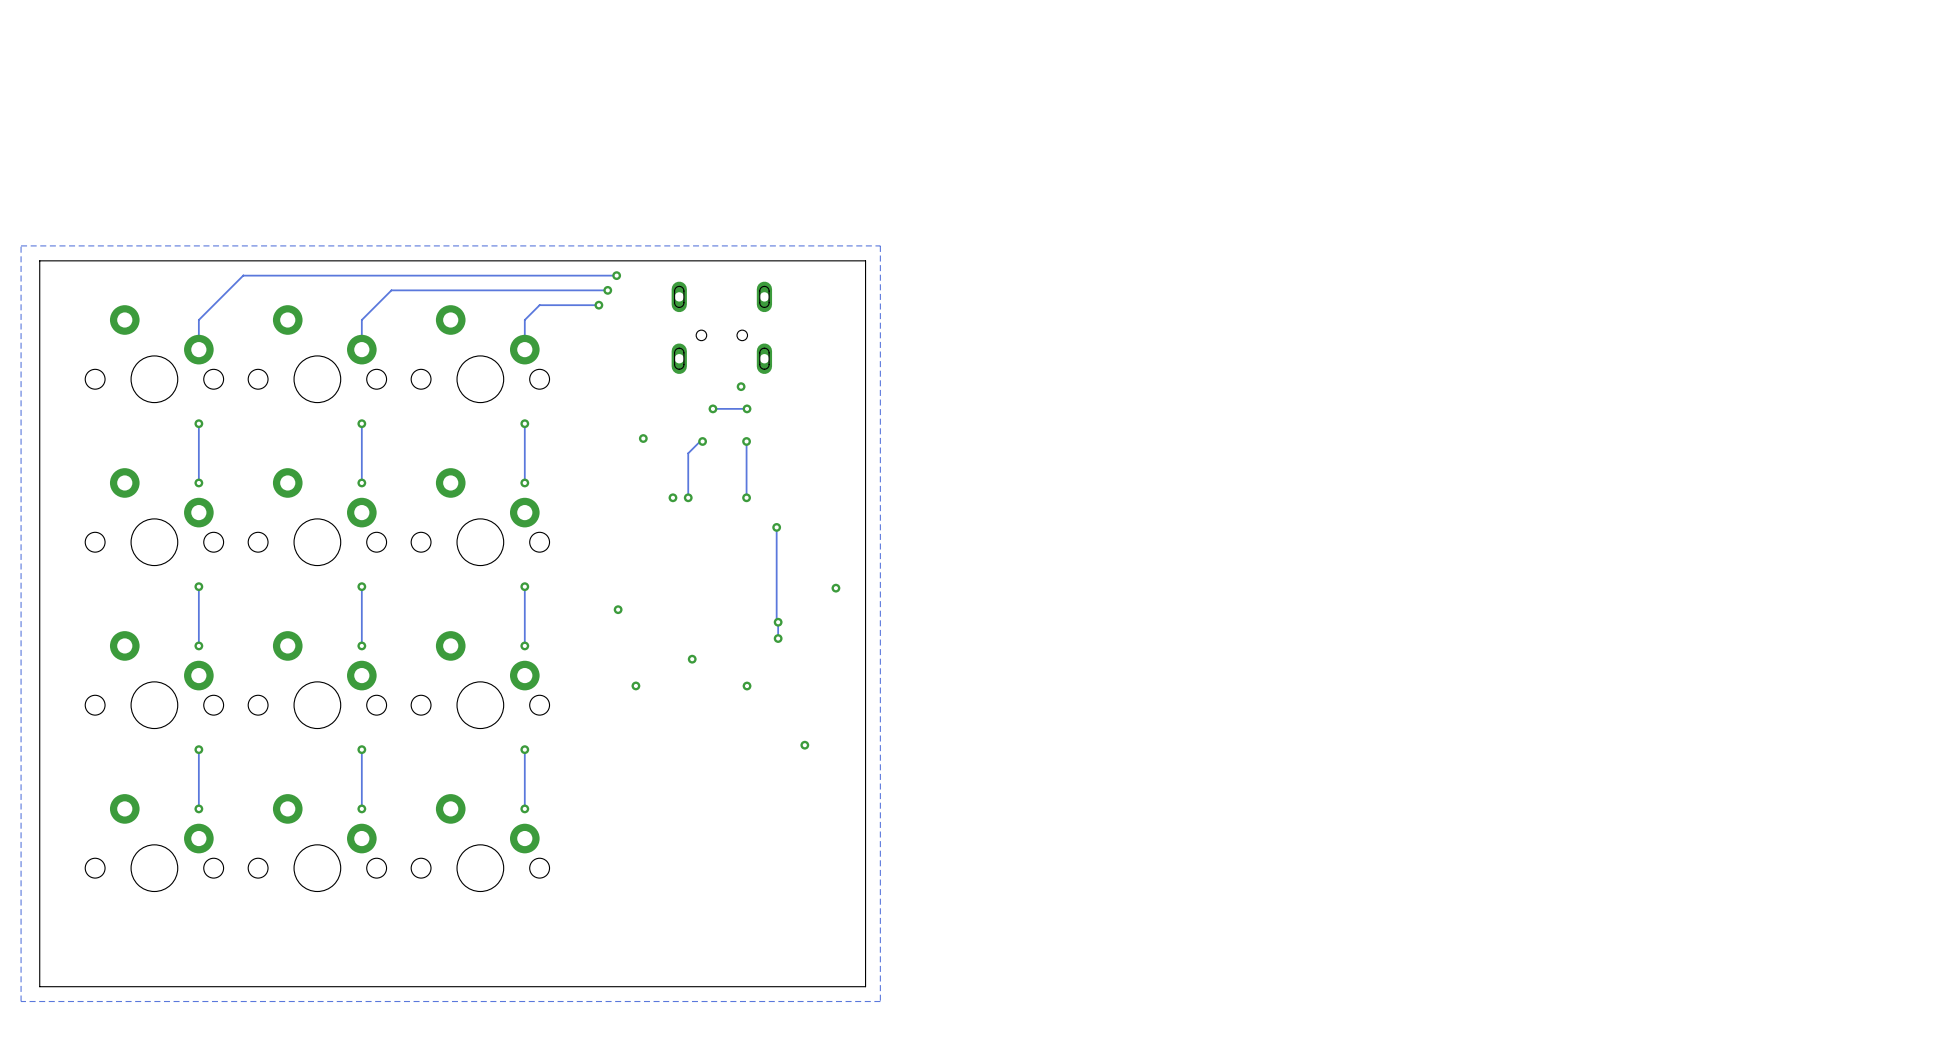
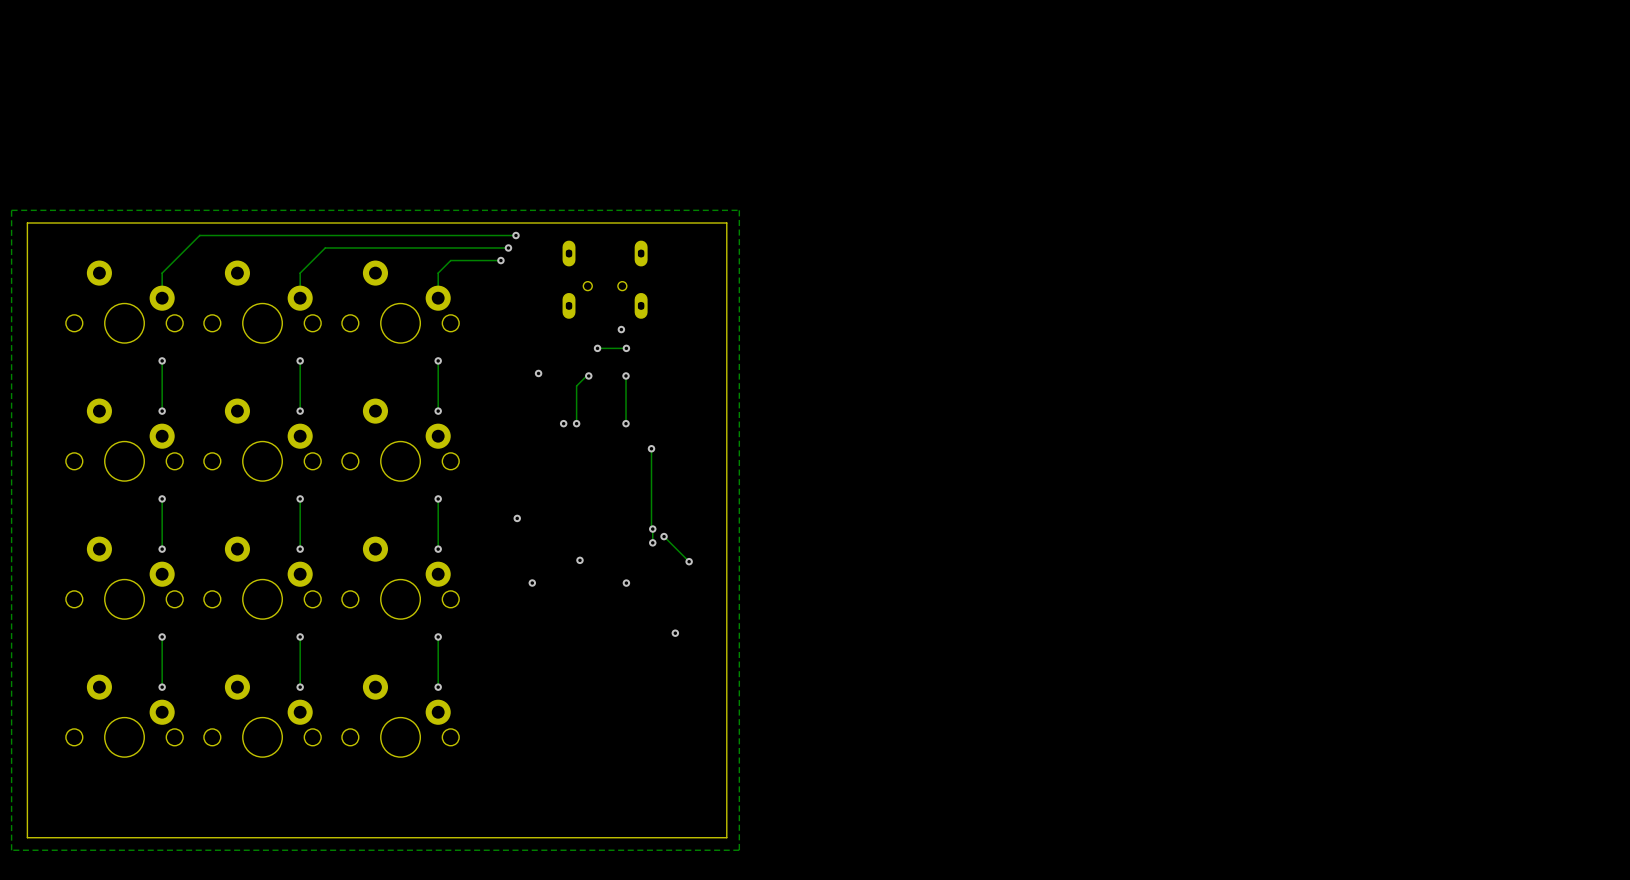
via: (835, 588) -> none
track: none -> (664, 536) (689, 561)
via: none -> (664, 536)
via: none -> (689, 561)

